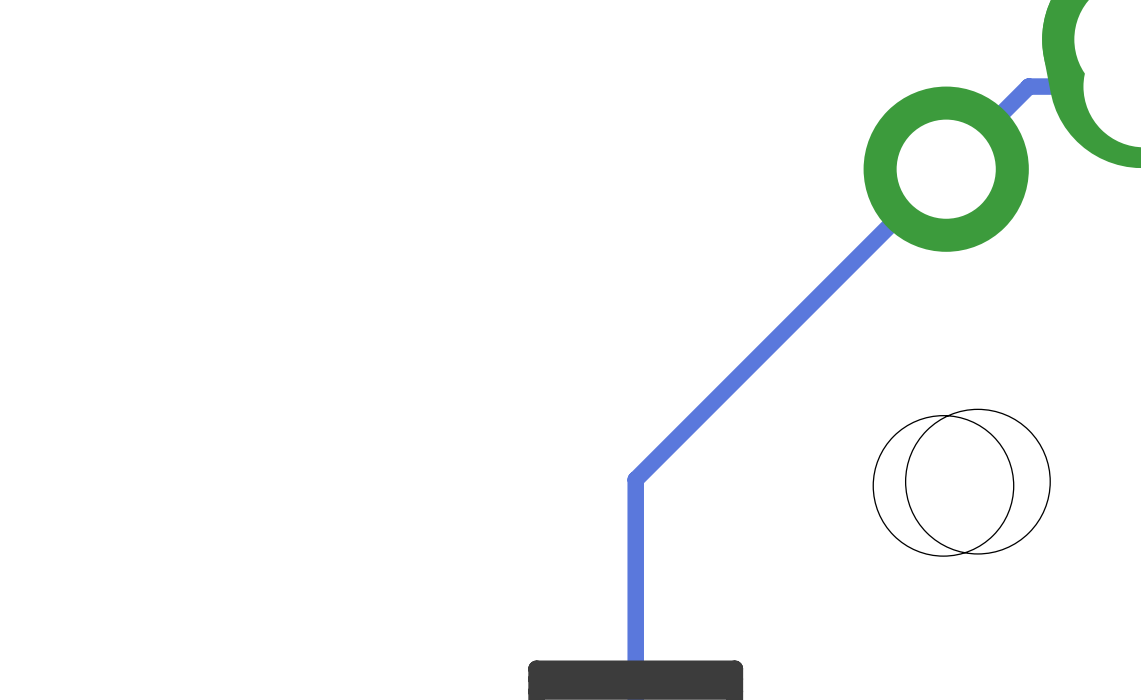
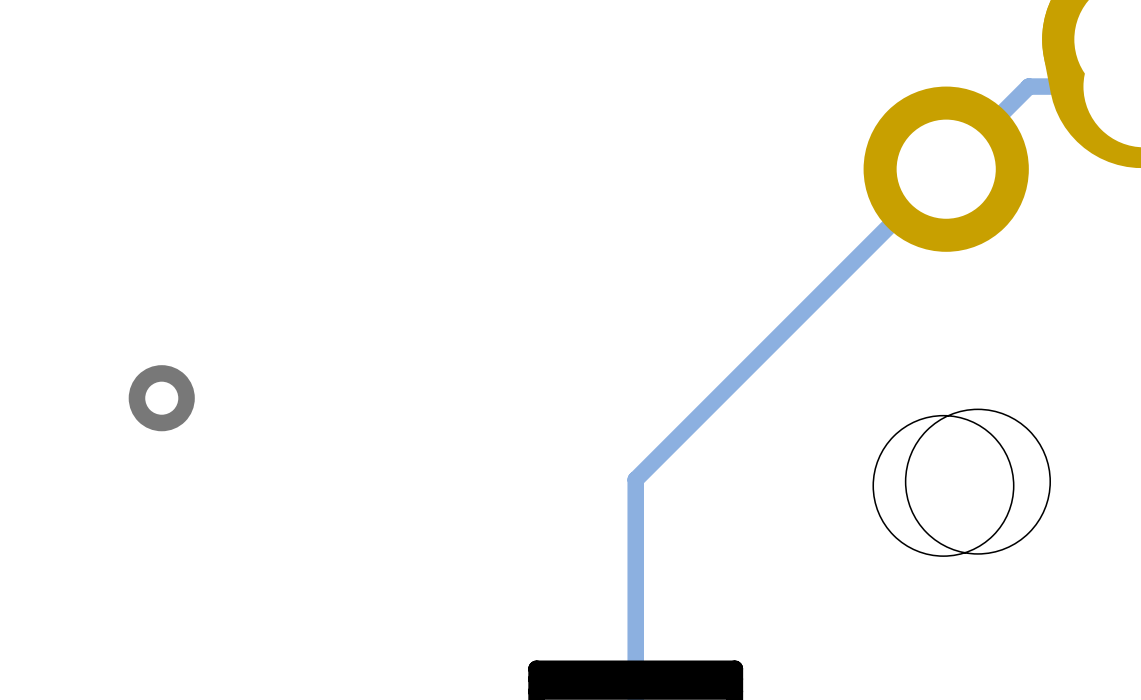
via: none -> (161, 398)

